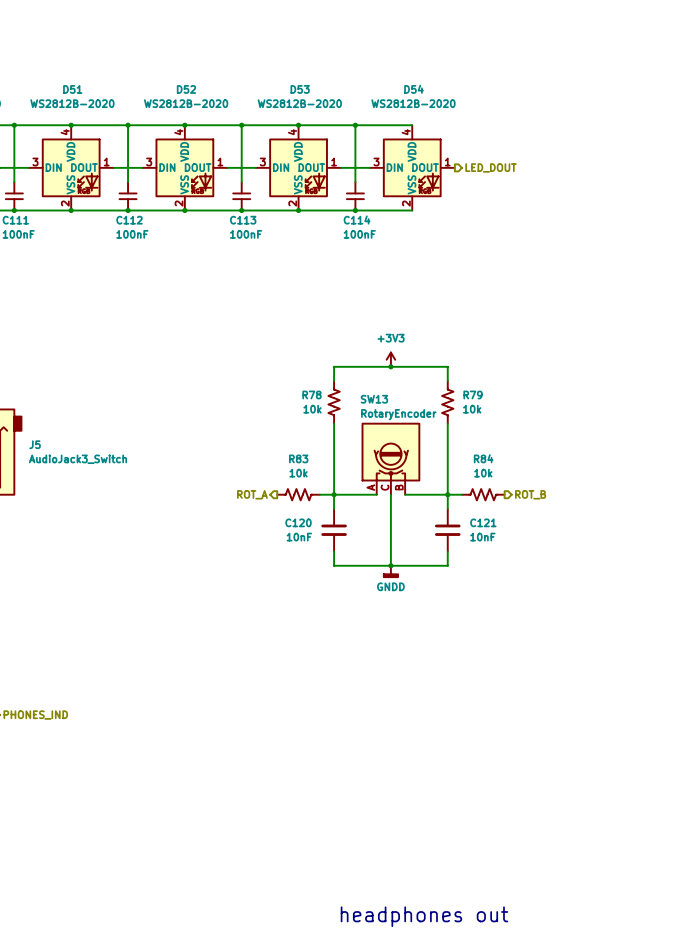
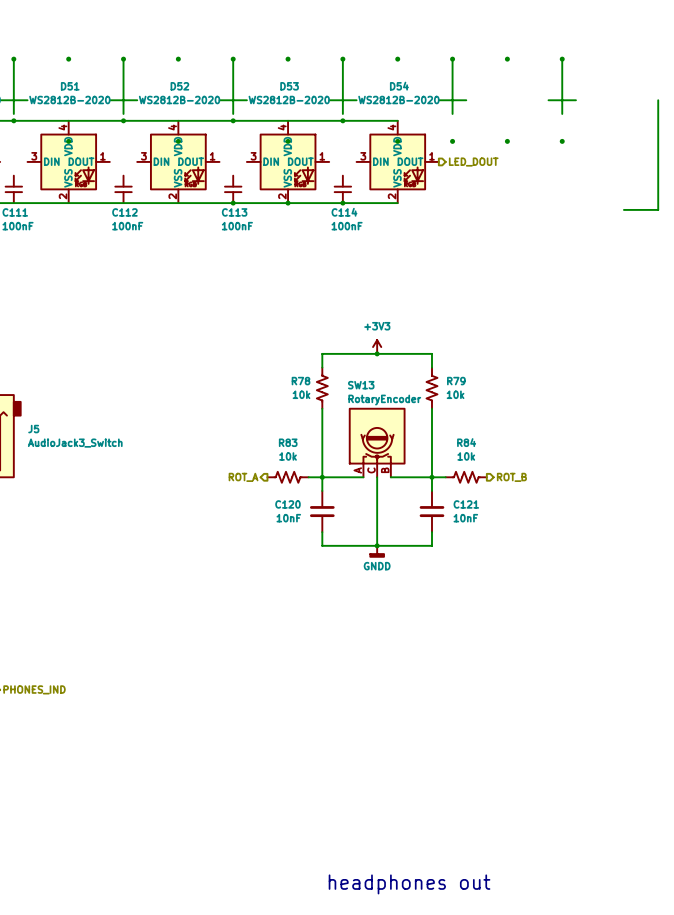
junction: none -> (13, 59)
junction: none -> (68, 59)
junction: none -> (123, 59)
junction: none -> (178, 59)
junction: none -> (233, 59)
junction: none -> (288, 59)
junction: none -> (342, 59)
junction: none -> (397, 59)
wire: none -> (452, 59) (452, 113)
junction: none -> (452, 59)
junction: none -> (507, 59)
wire: none -> (562, 59) (562, 113)
junction: none -> (562, 59)
wire: none -> (438, 100) (466, 100)
wire: none -> (548, 100) (575, 100)
wire: none -> (658, 100) (658, 209) (623, 209)
wire: (14, 125) (14, 182) -> (13, 59) (13, 113)
junction position: (71, 125) -> (68, 141)
wire: (128, 125) (128, 182) -> (123, 59) (123, 113)
junction position: (184, 125) -> (178, 141)
wire: (241, 125) (241, 182) -> (233, 59) (233, 113)
junction position: (298, 125) -> (288, 141)
wire: (355, 125) (355, 182) -> (342, 59) (342, 113)
junction: none -> (397, 141)
junction: none -> (452, 141)
junction: none -> (507, 141)
junction: none -> (562, 141)
wire: (0, 167) (28, 167) -> (0, 100) (27, 100)
wire: (113, 167) (142, 167) -> (109, 100) (137, 100)
wire: (227, 167) (255, 167) -> (219, 100) (246, 100)
wire: (341, 167) (369, 167) -> (329, 100) (356, 100)
junction: (14, 210) -> none
junction: (71, 210) -> none
junction: (128, 210) -> none
junction: (184, 210) -> none

